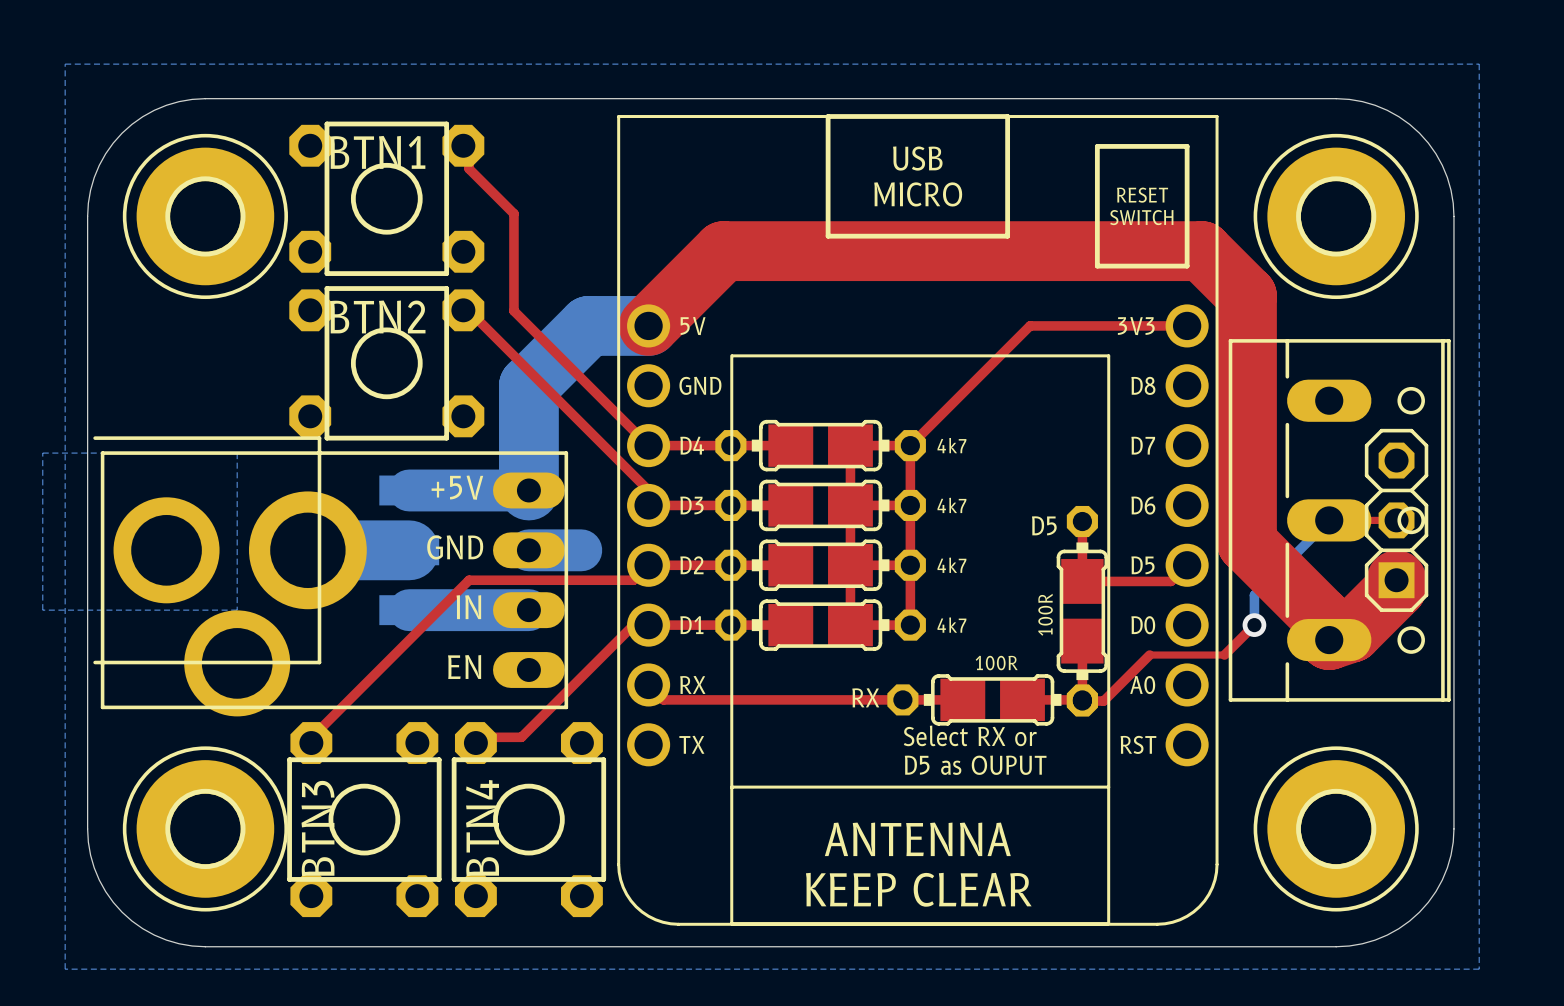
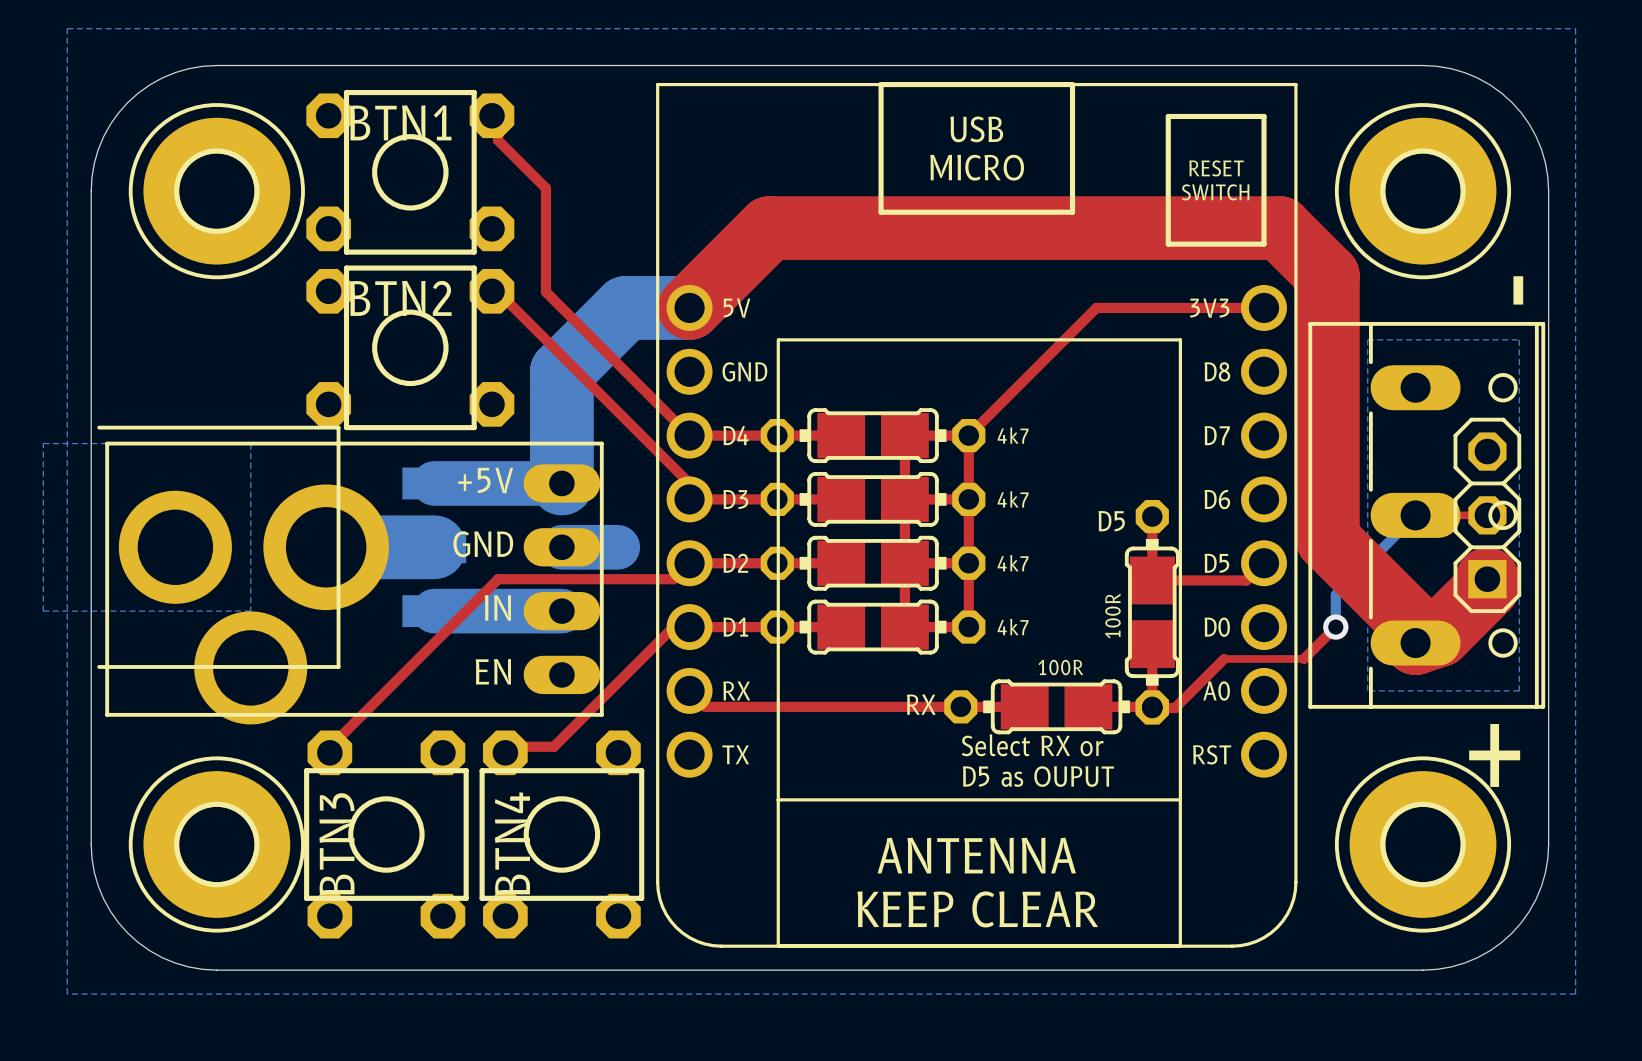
text: none -> - (1518, 290)
bottom zone outline: none -> (1367, 339) (1519, 339) (1519, 690) (1367, 690) (1367, 339)
text: none -> + (1494, 755)

